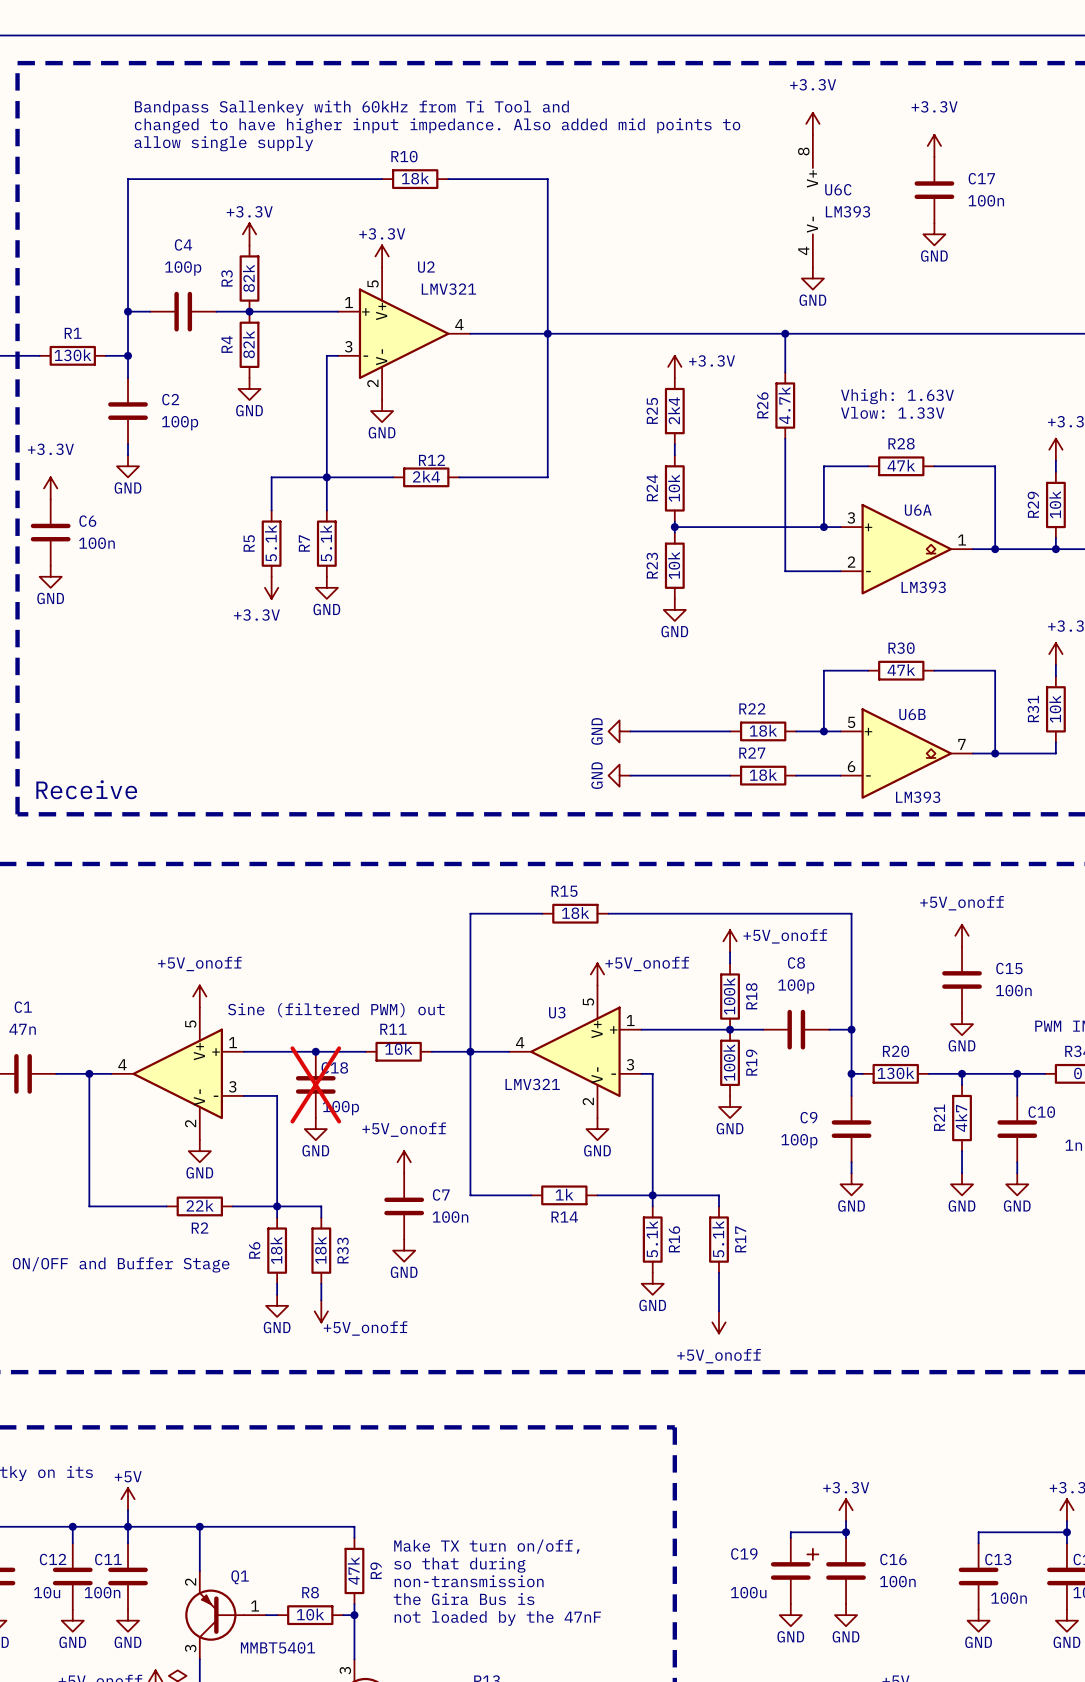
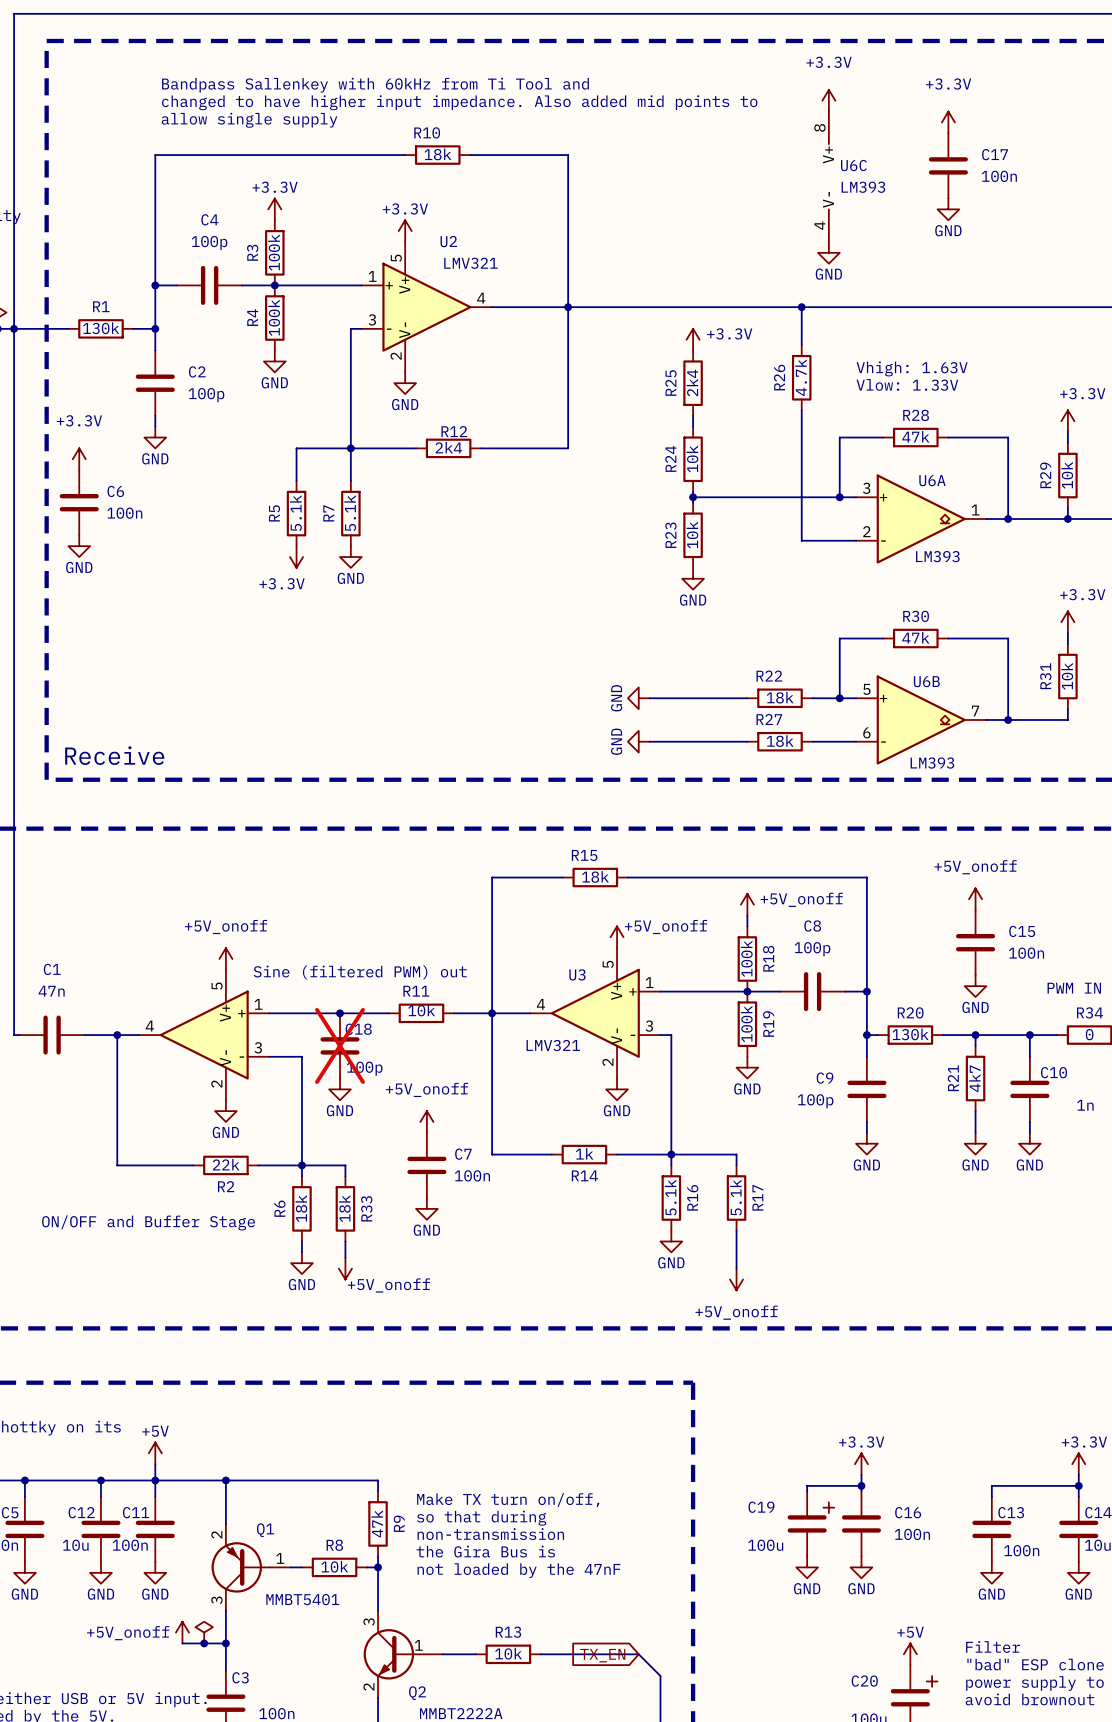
R3 value: 82k (248, 278) -> 100k (274, 252)
R4 value: 82k (248, 344) -> 100k (274, 317)

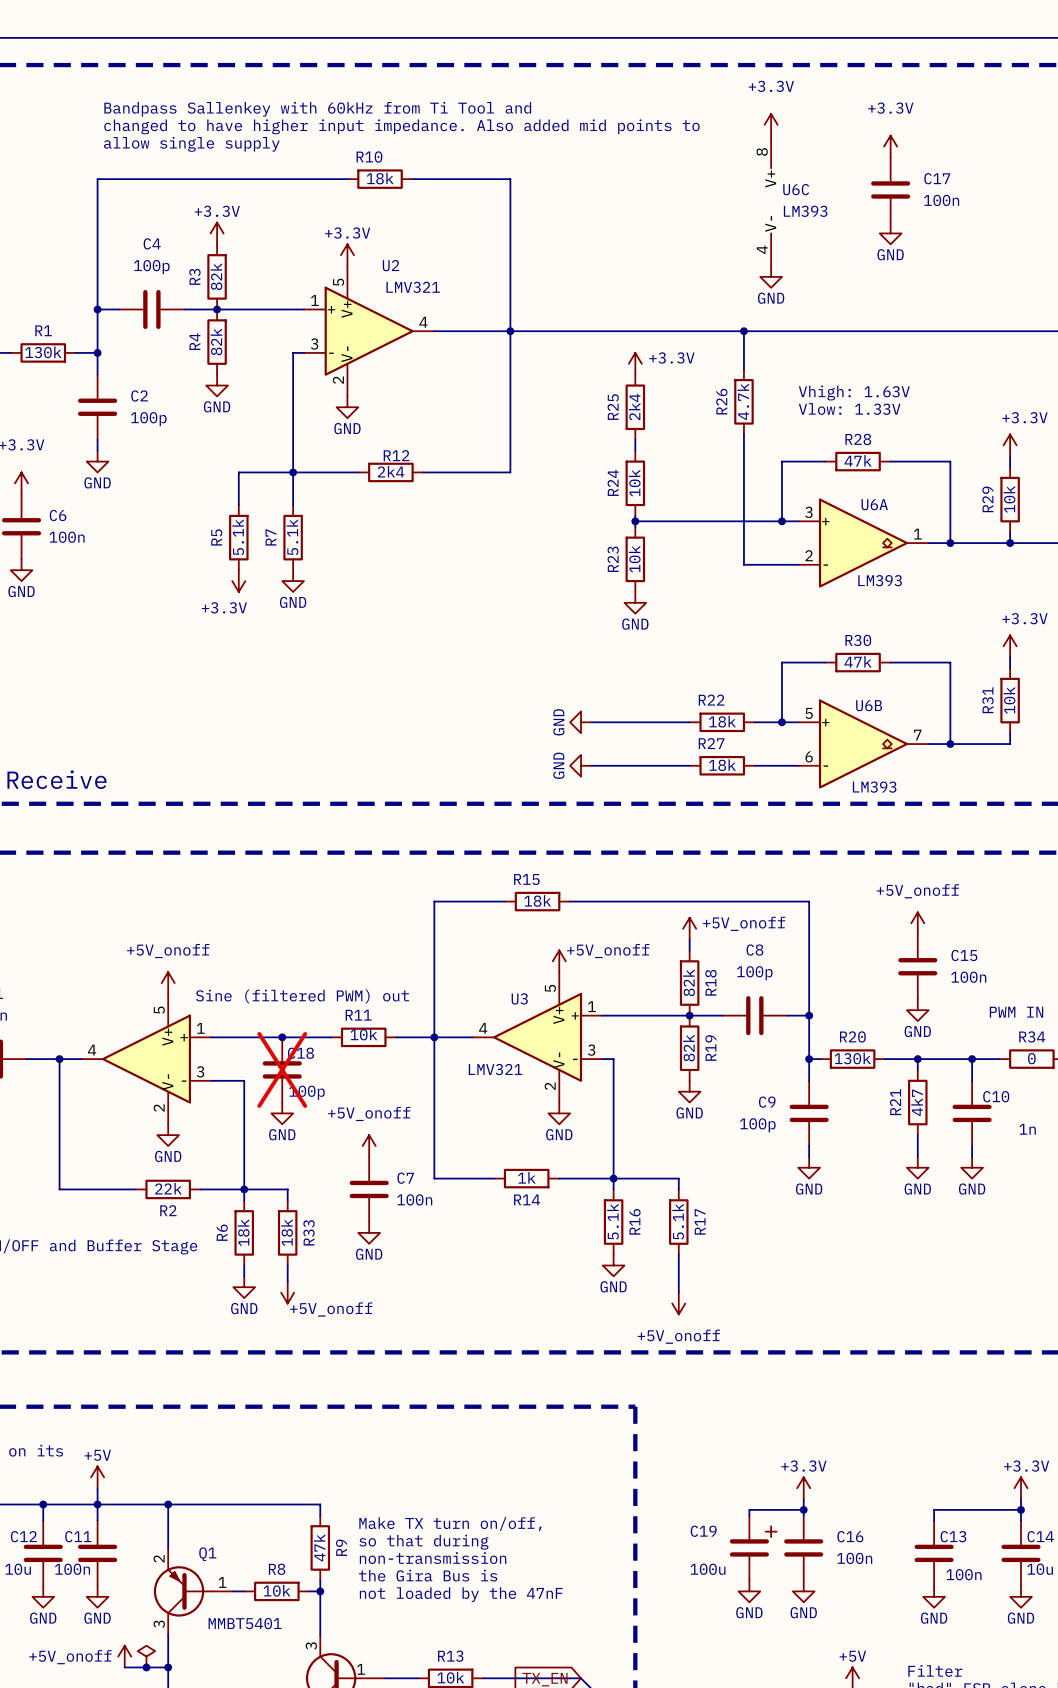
R3 value: 100k (274, 252) -> 82k (216, 276)
R4 value: 100k (274, 317) -> 82k (216, 341)
R18 value: 100k (746, 958) -> 82k (689, 982)
R19 value: 100k (746, 1023) -> 82k (689, 1047)

